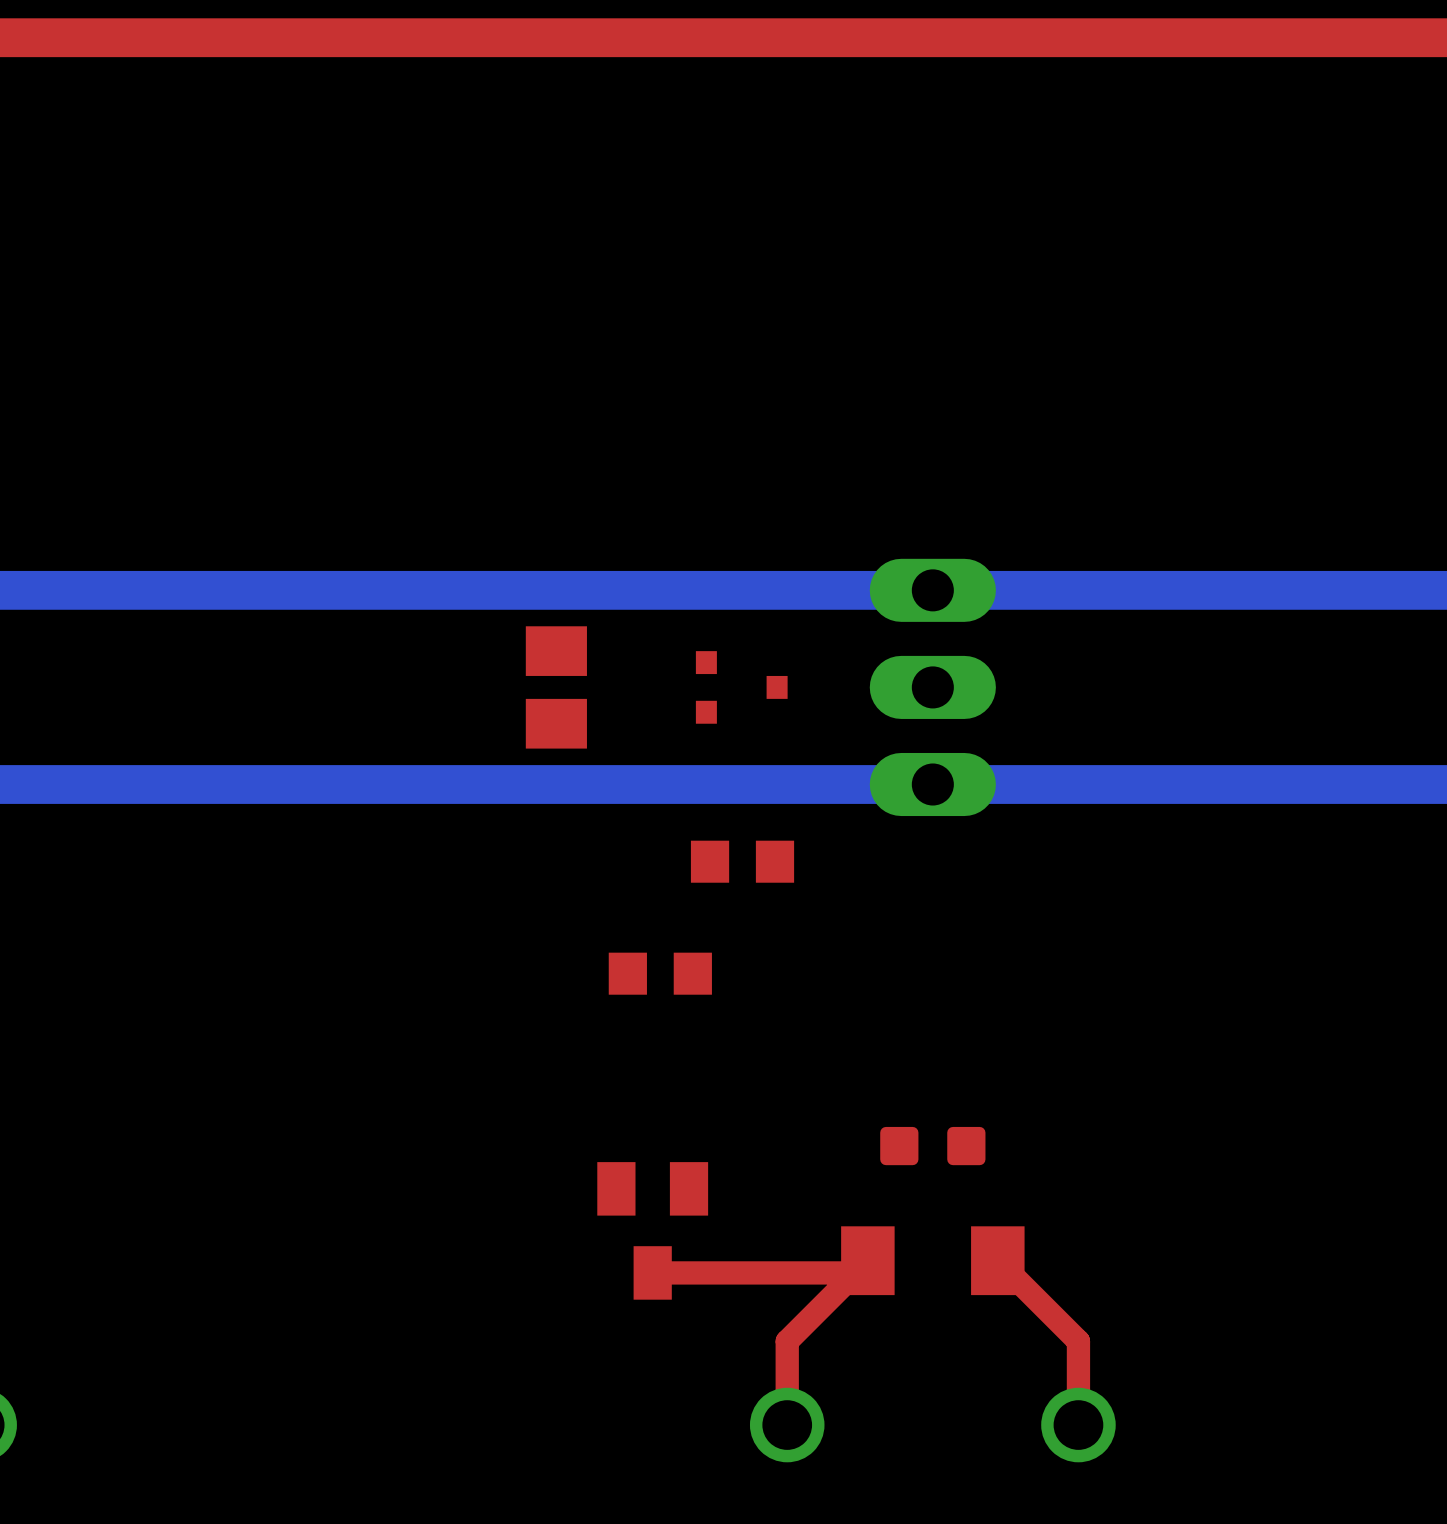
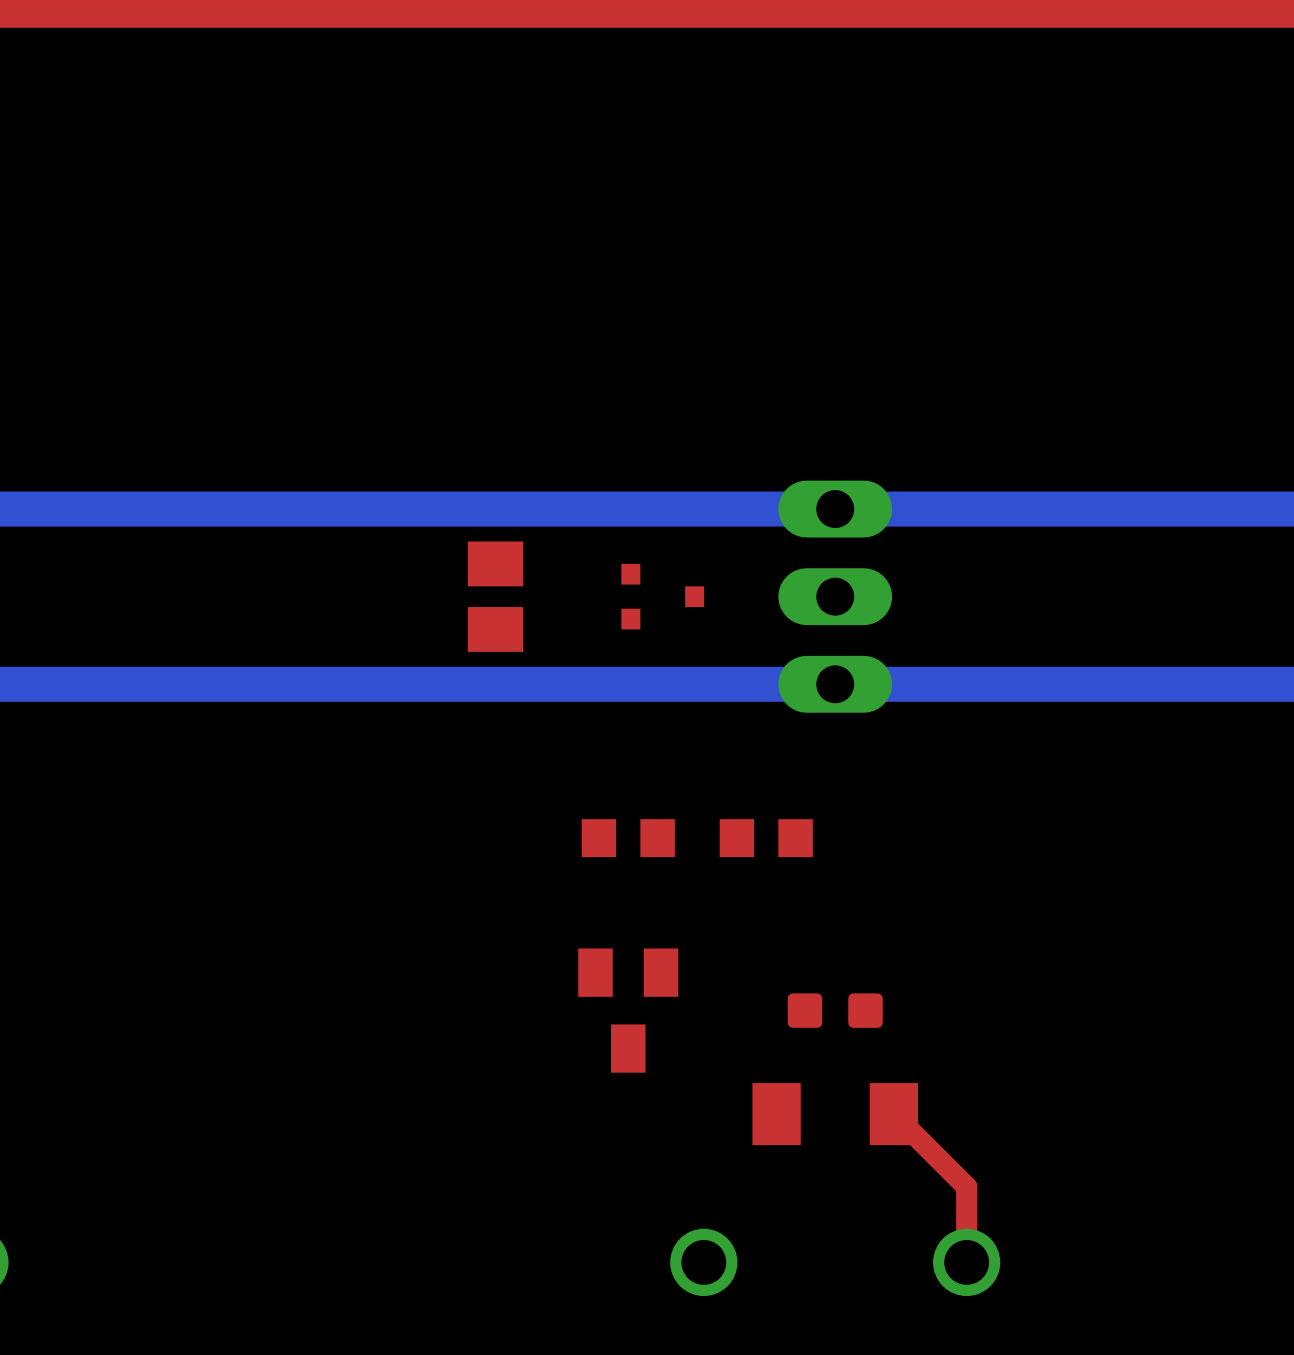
part: (742, 861) -> none
part: none -> (766, 838)
part position: (660, 973) -> (628, 838)
part position: (652, 1230) -> (628, 1010)
top track: (867, 1260) (787, 1341) (787, 1425) -> none
top track: (652, 1272) (851, 1272) (853, 1275) -> none

